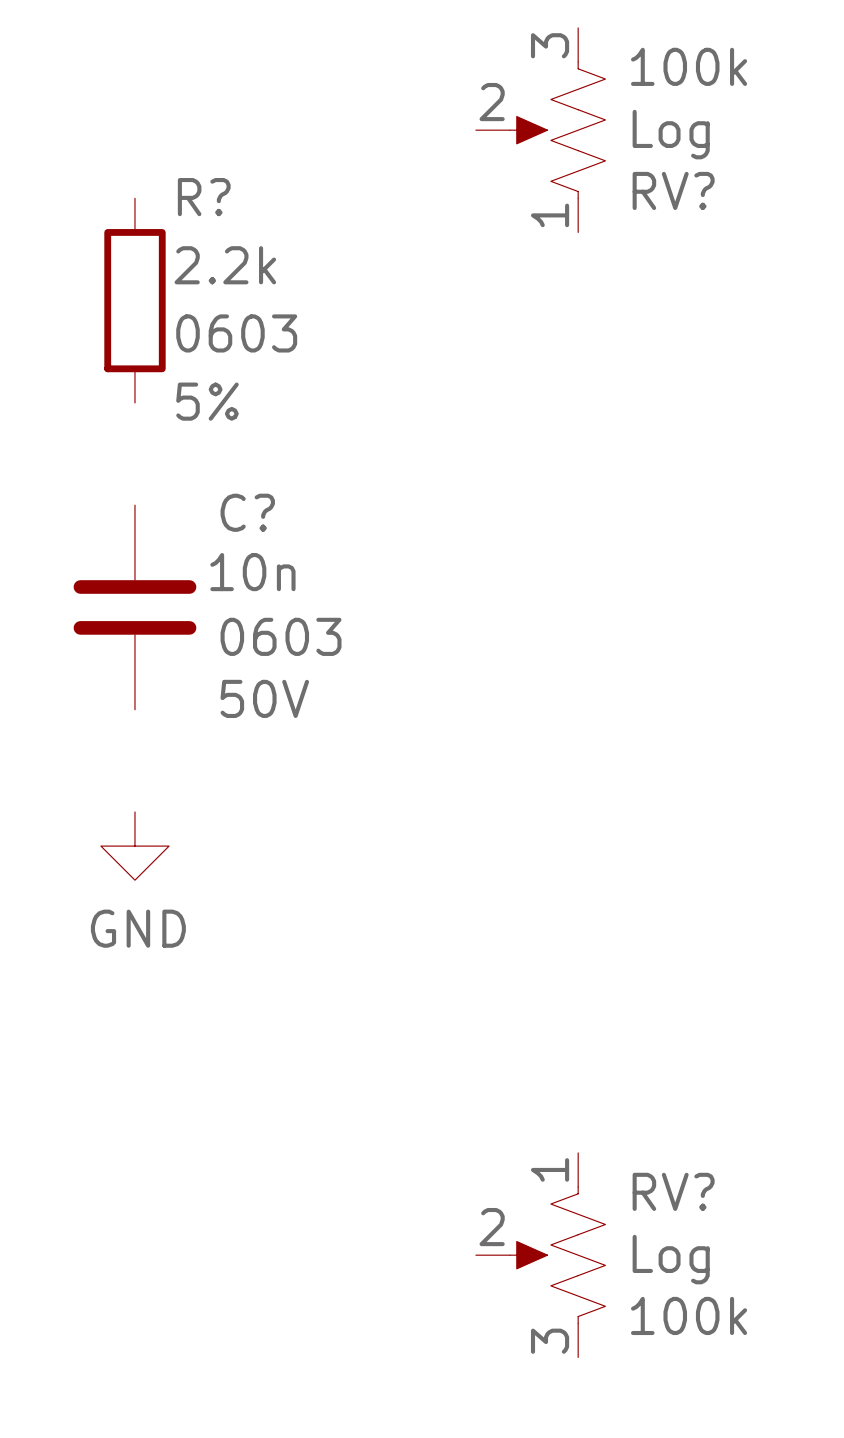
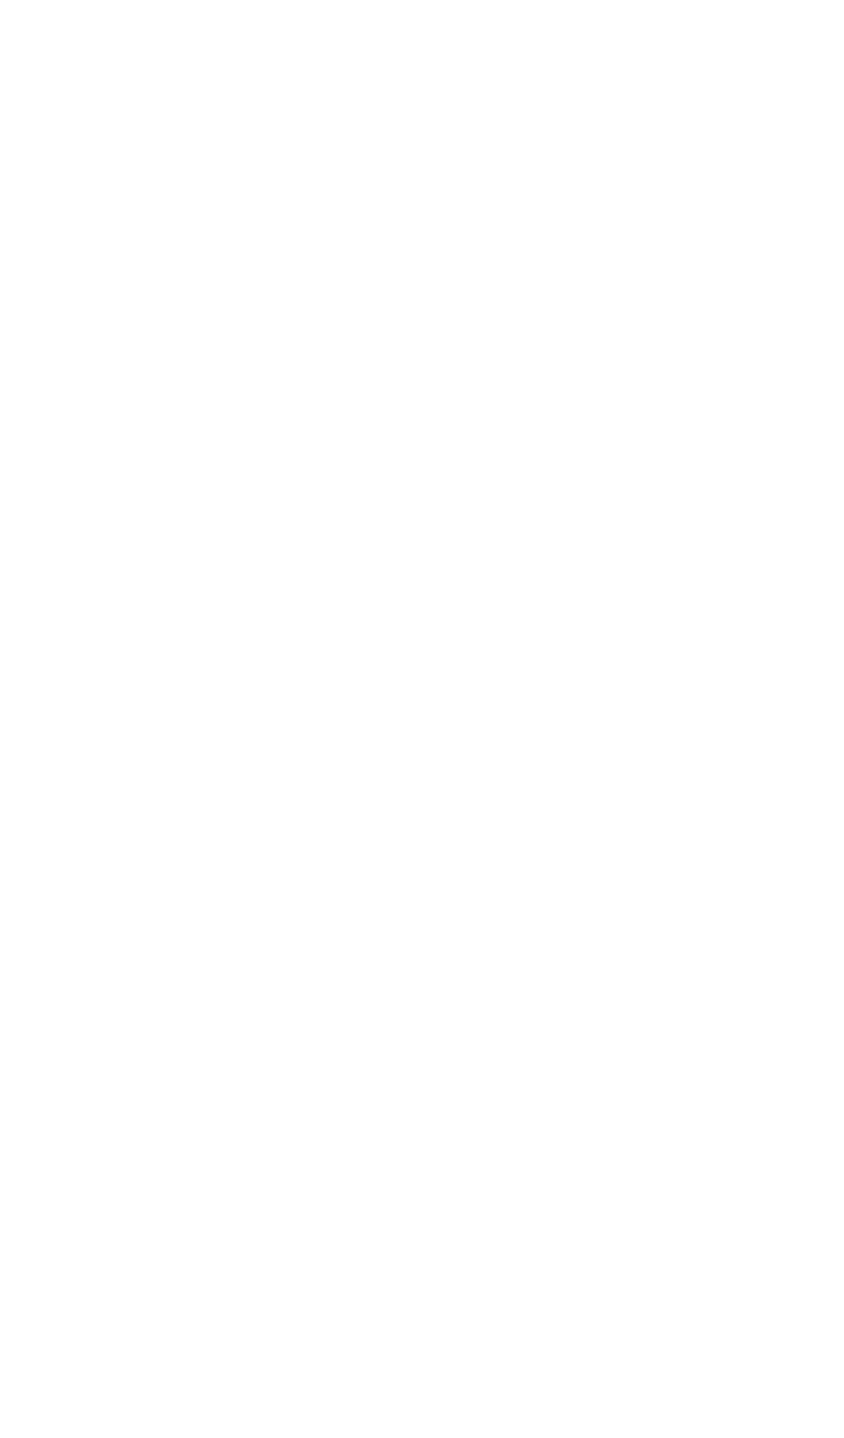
RV?: (540, 130) -> none
R?: 2.2k (134, 300) -> none
C?: 10n (134, 607) -> none
power symbol: GND (134, 846) -> none
RV?: (540, 1255) -> none

